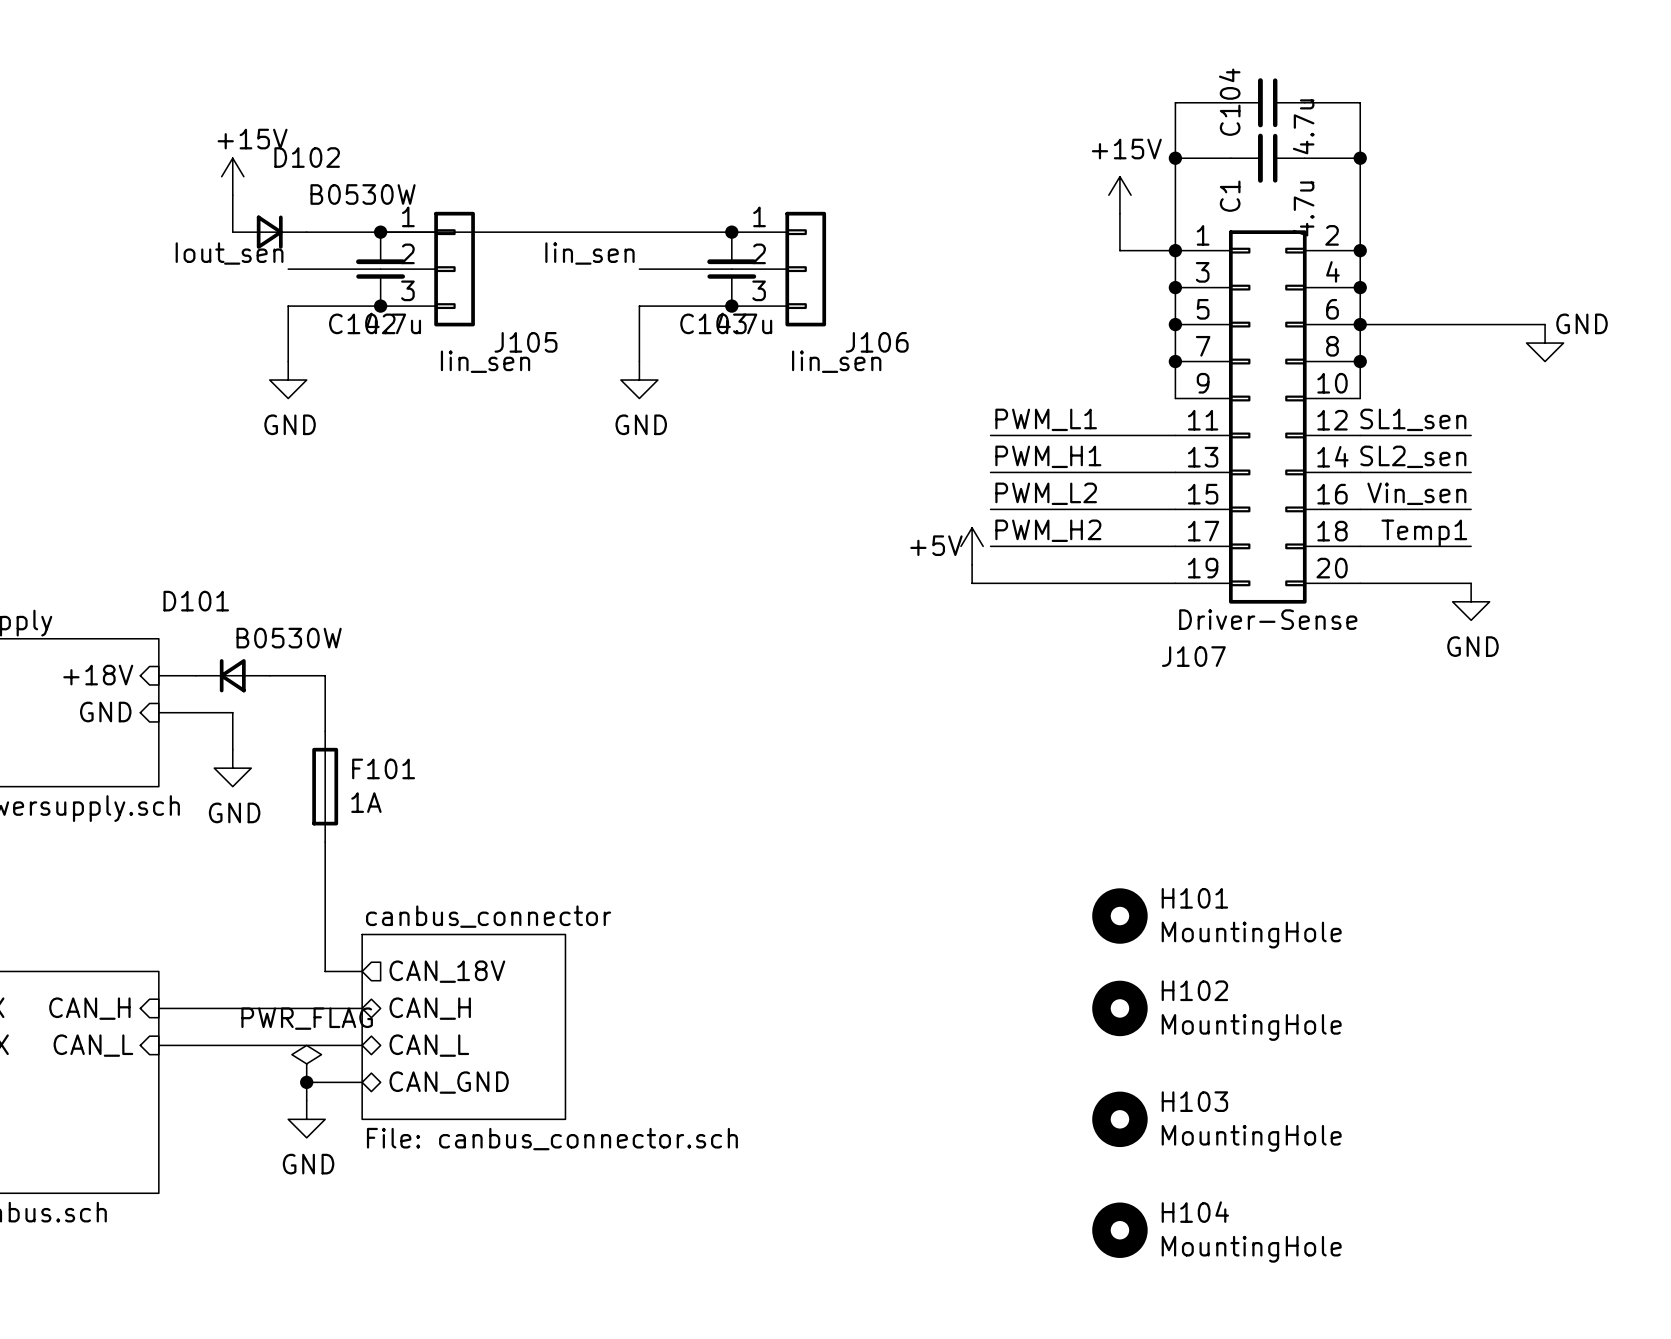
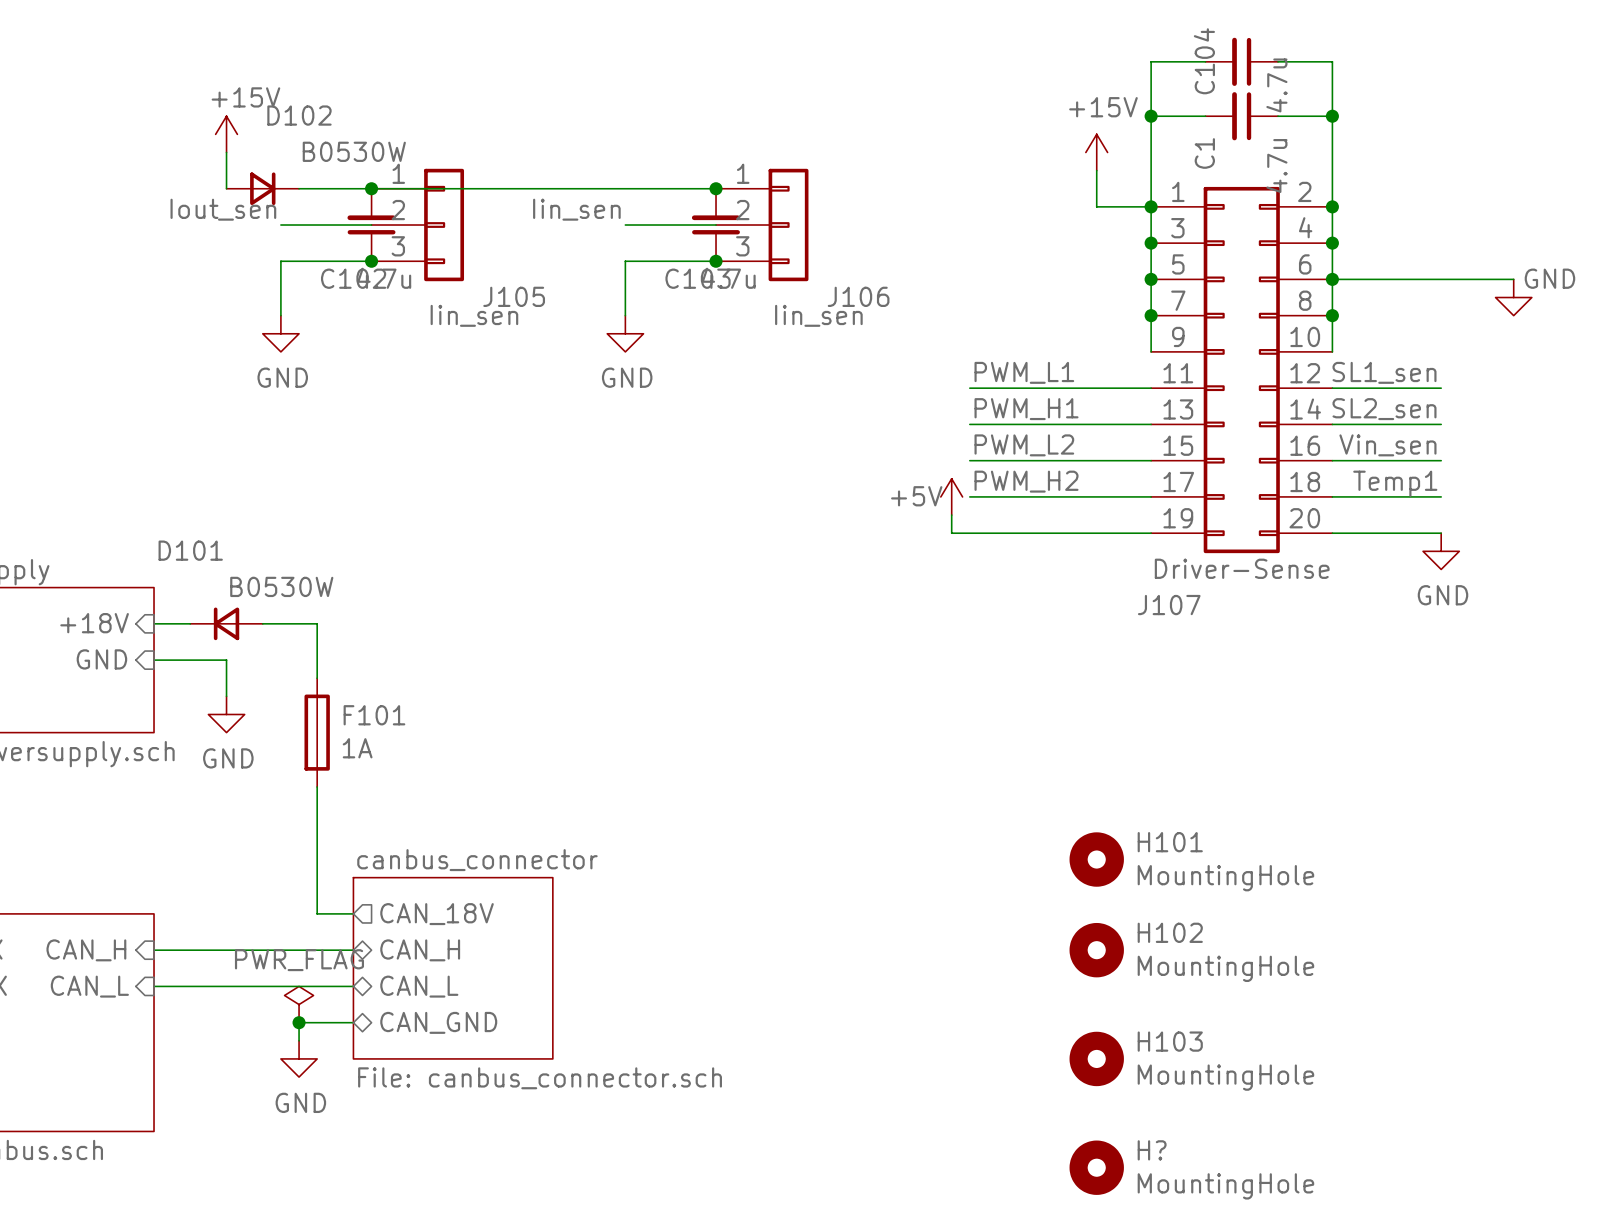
H104 name: H104 (1195, 1212) -> H? (1152, 1150)

